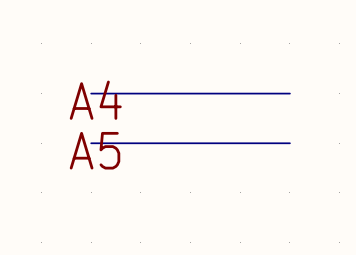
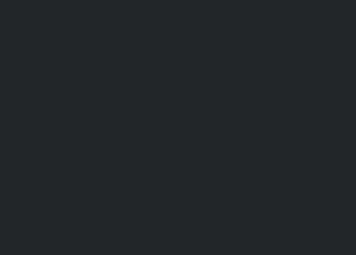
wire: (91, 93) (289, 93) -> none
label: A4 (95, 100) -> none
wire: (91, 143) (289, 143) -> none
label: A5 (95, 150) -> none

